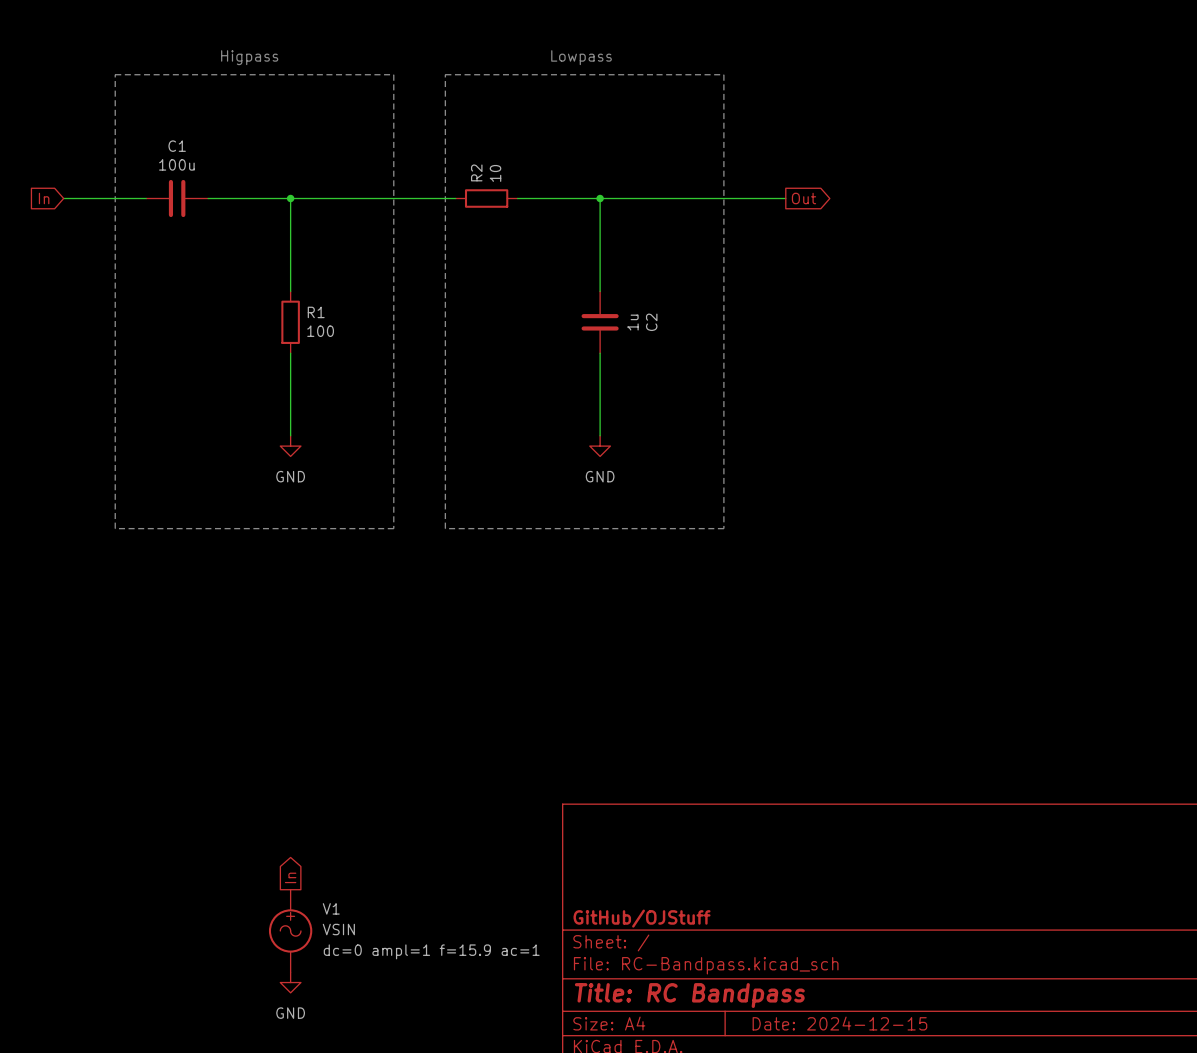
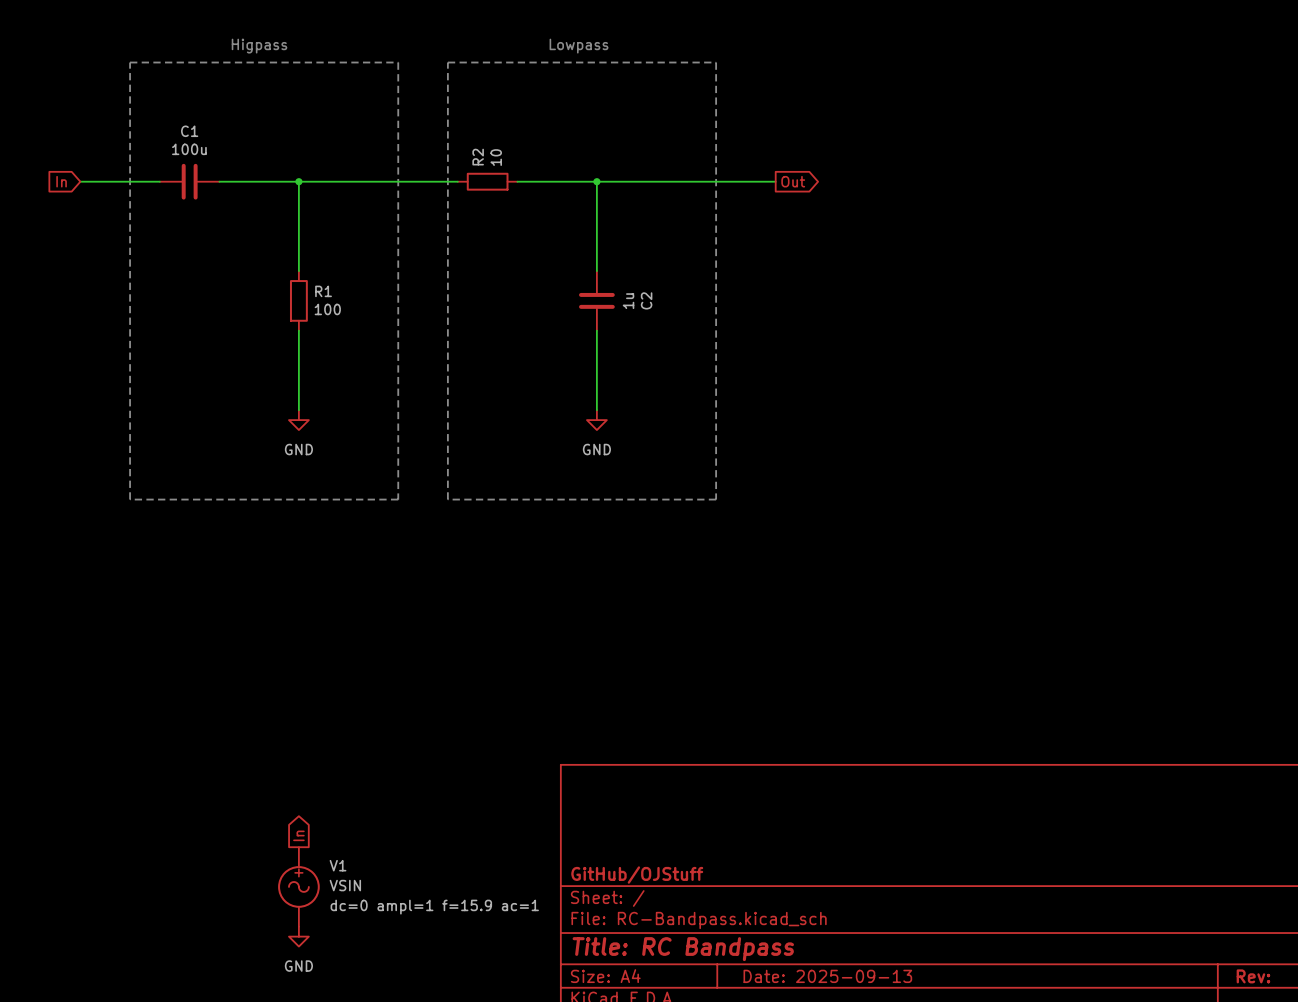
title block: Date: 2024-12-15 (839, 1023) -> Date: 2025-09-13 (827, 976)

